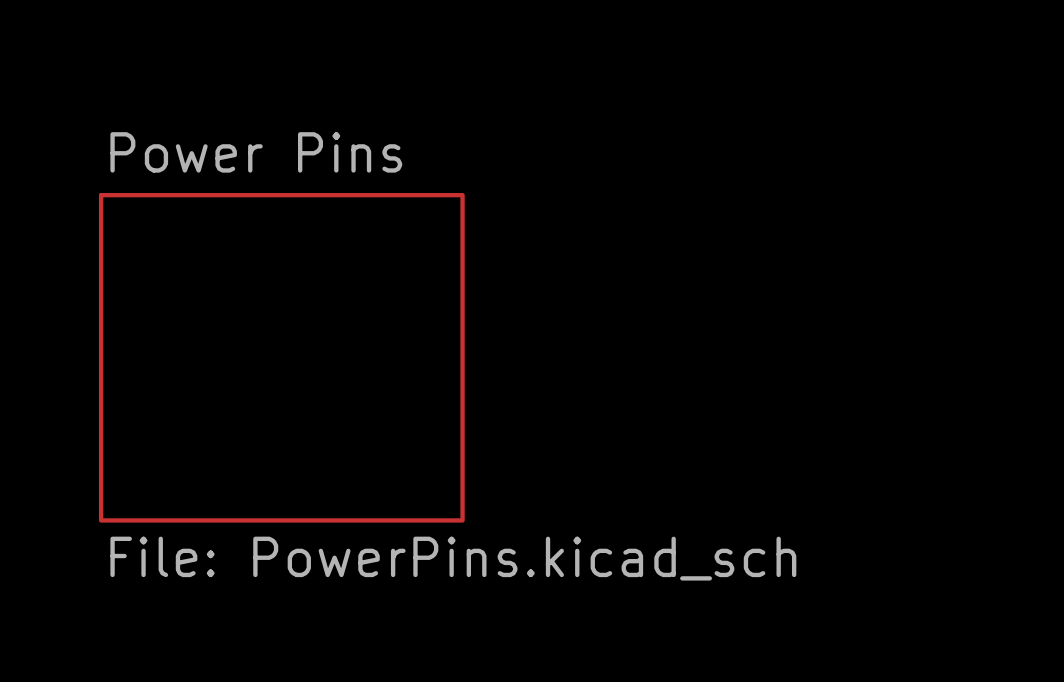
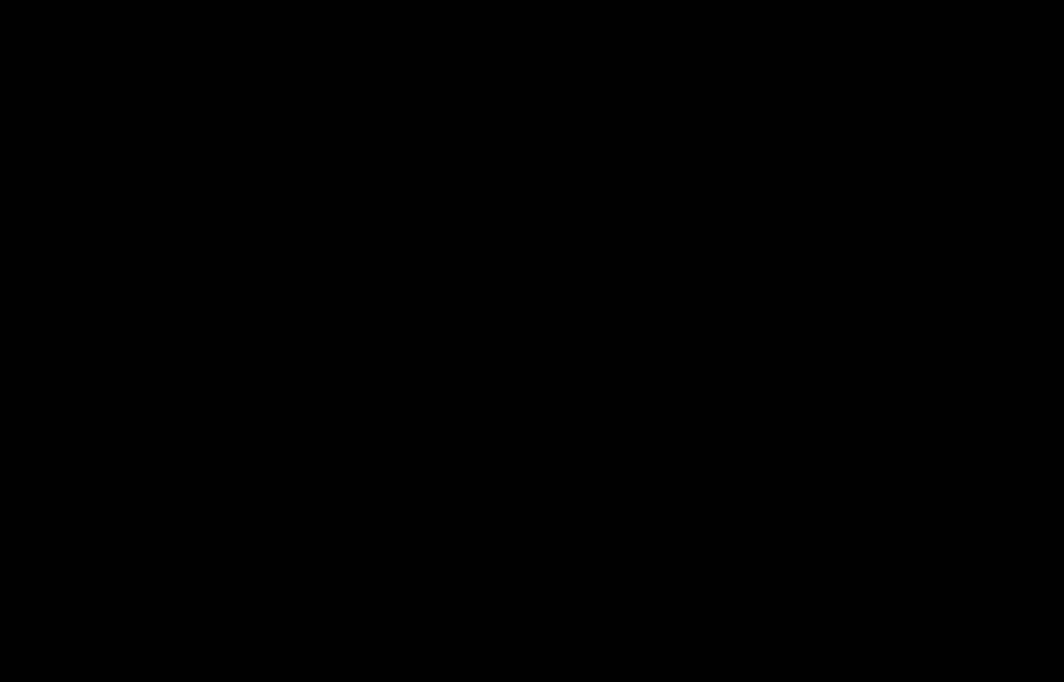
sheet Power Pins: File: PowerPins.kicad_sch (281, 357) -> none

